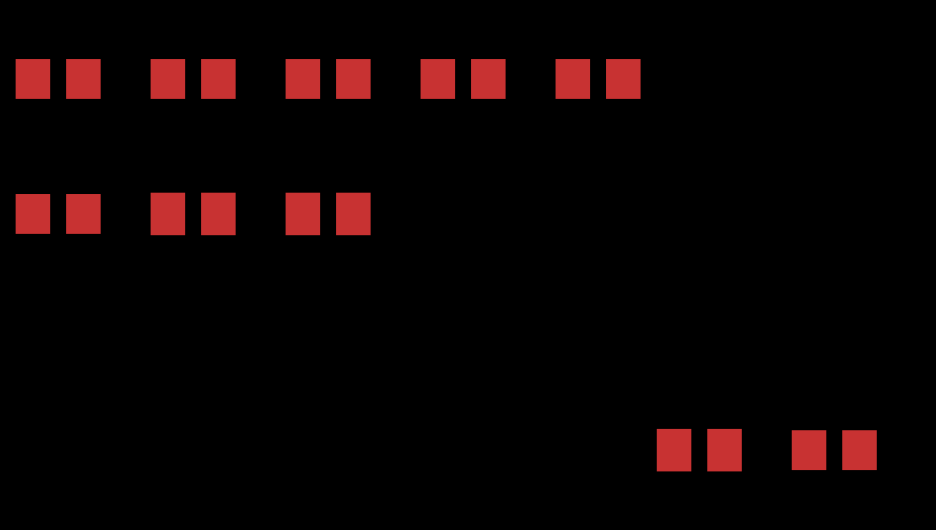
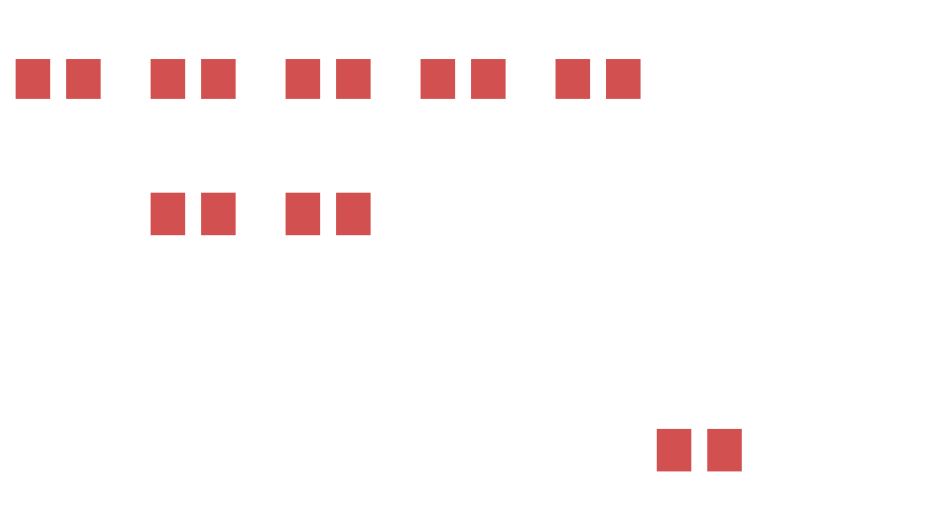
part: (58, 213) -> none
part: (834, 450) -> none

